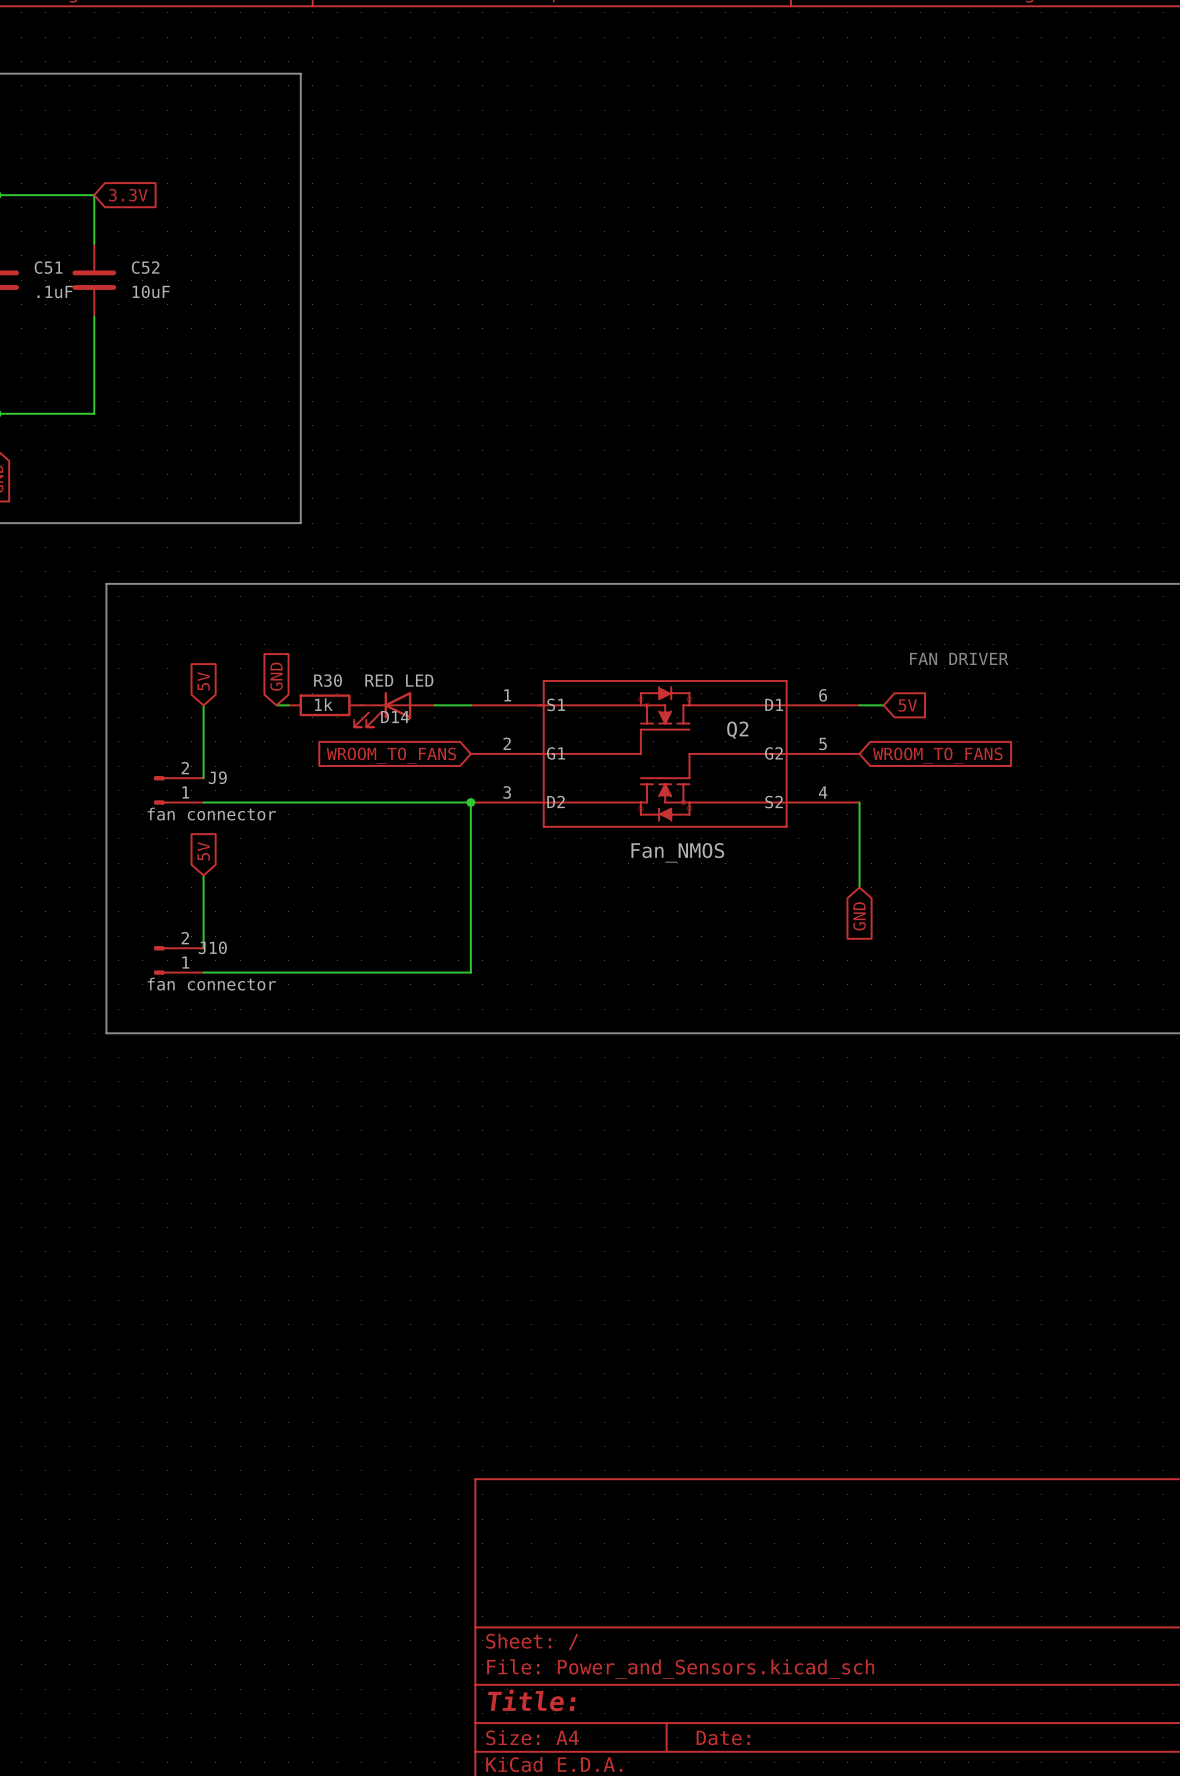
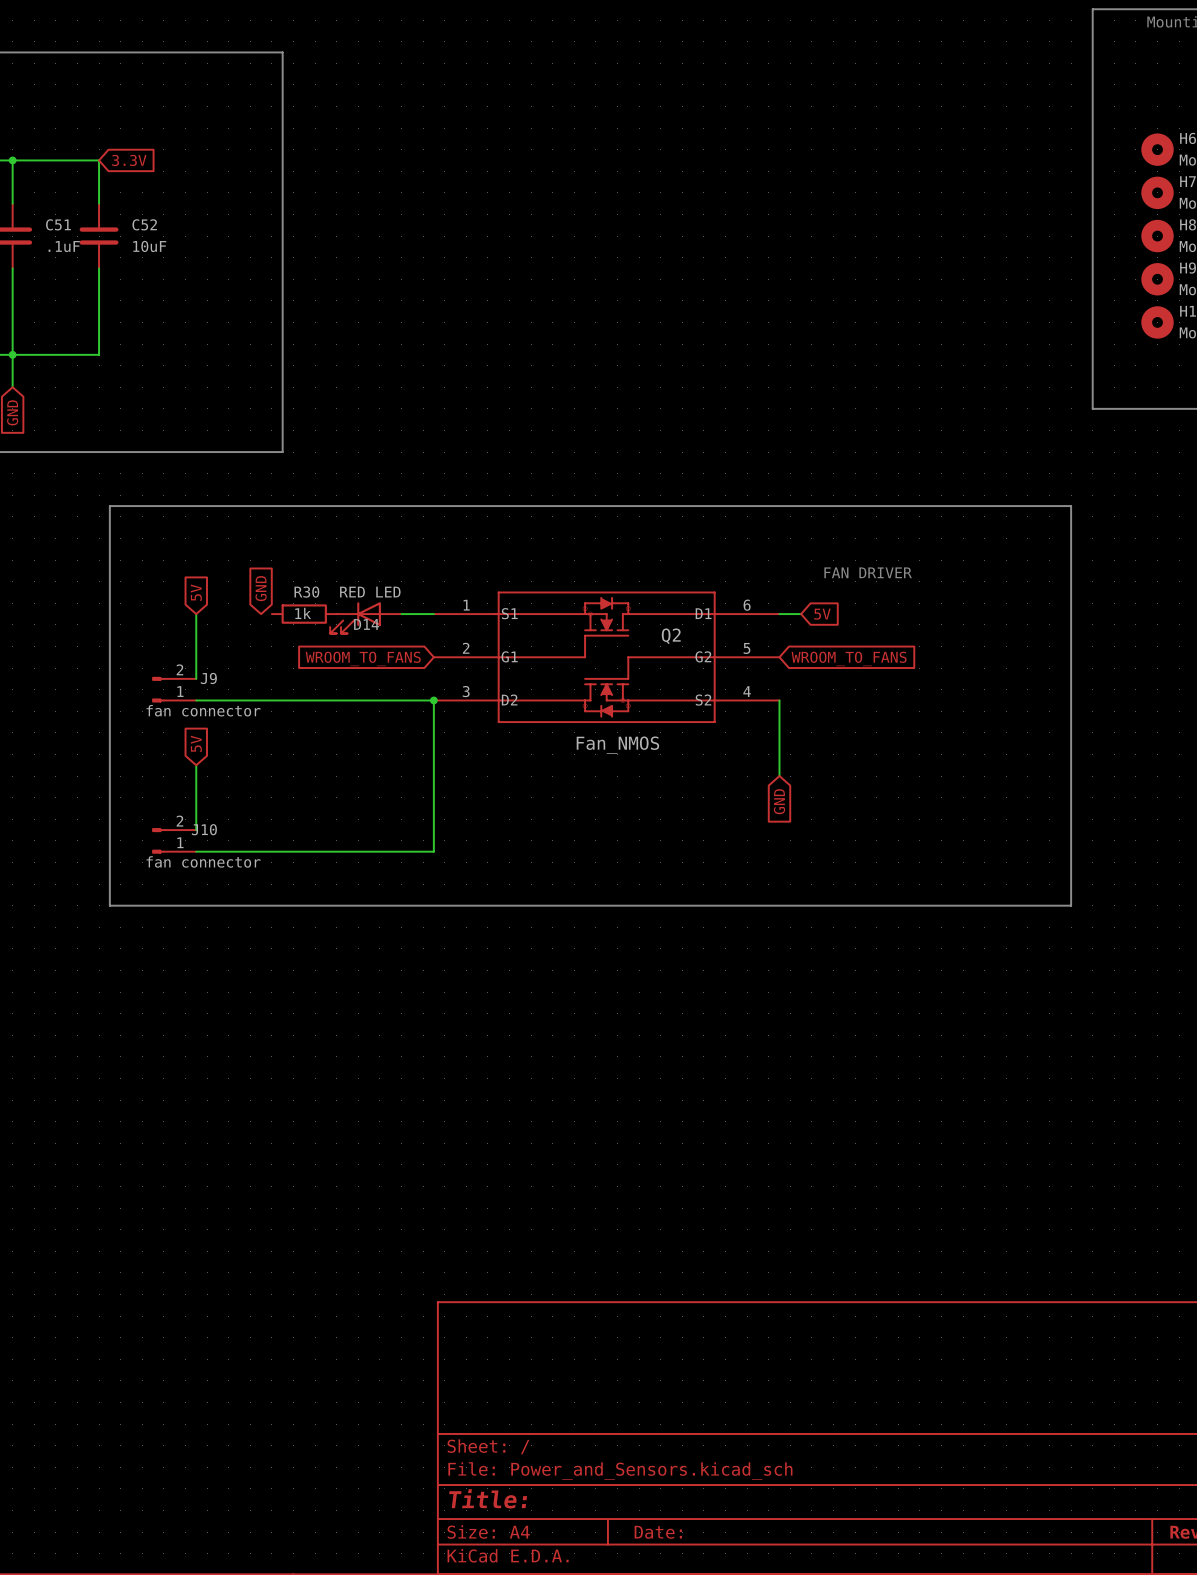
wire: (276, 705) (288, 705) -> none

